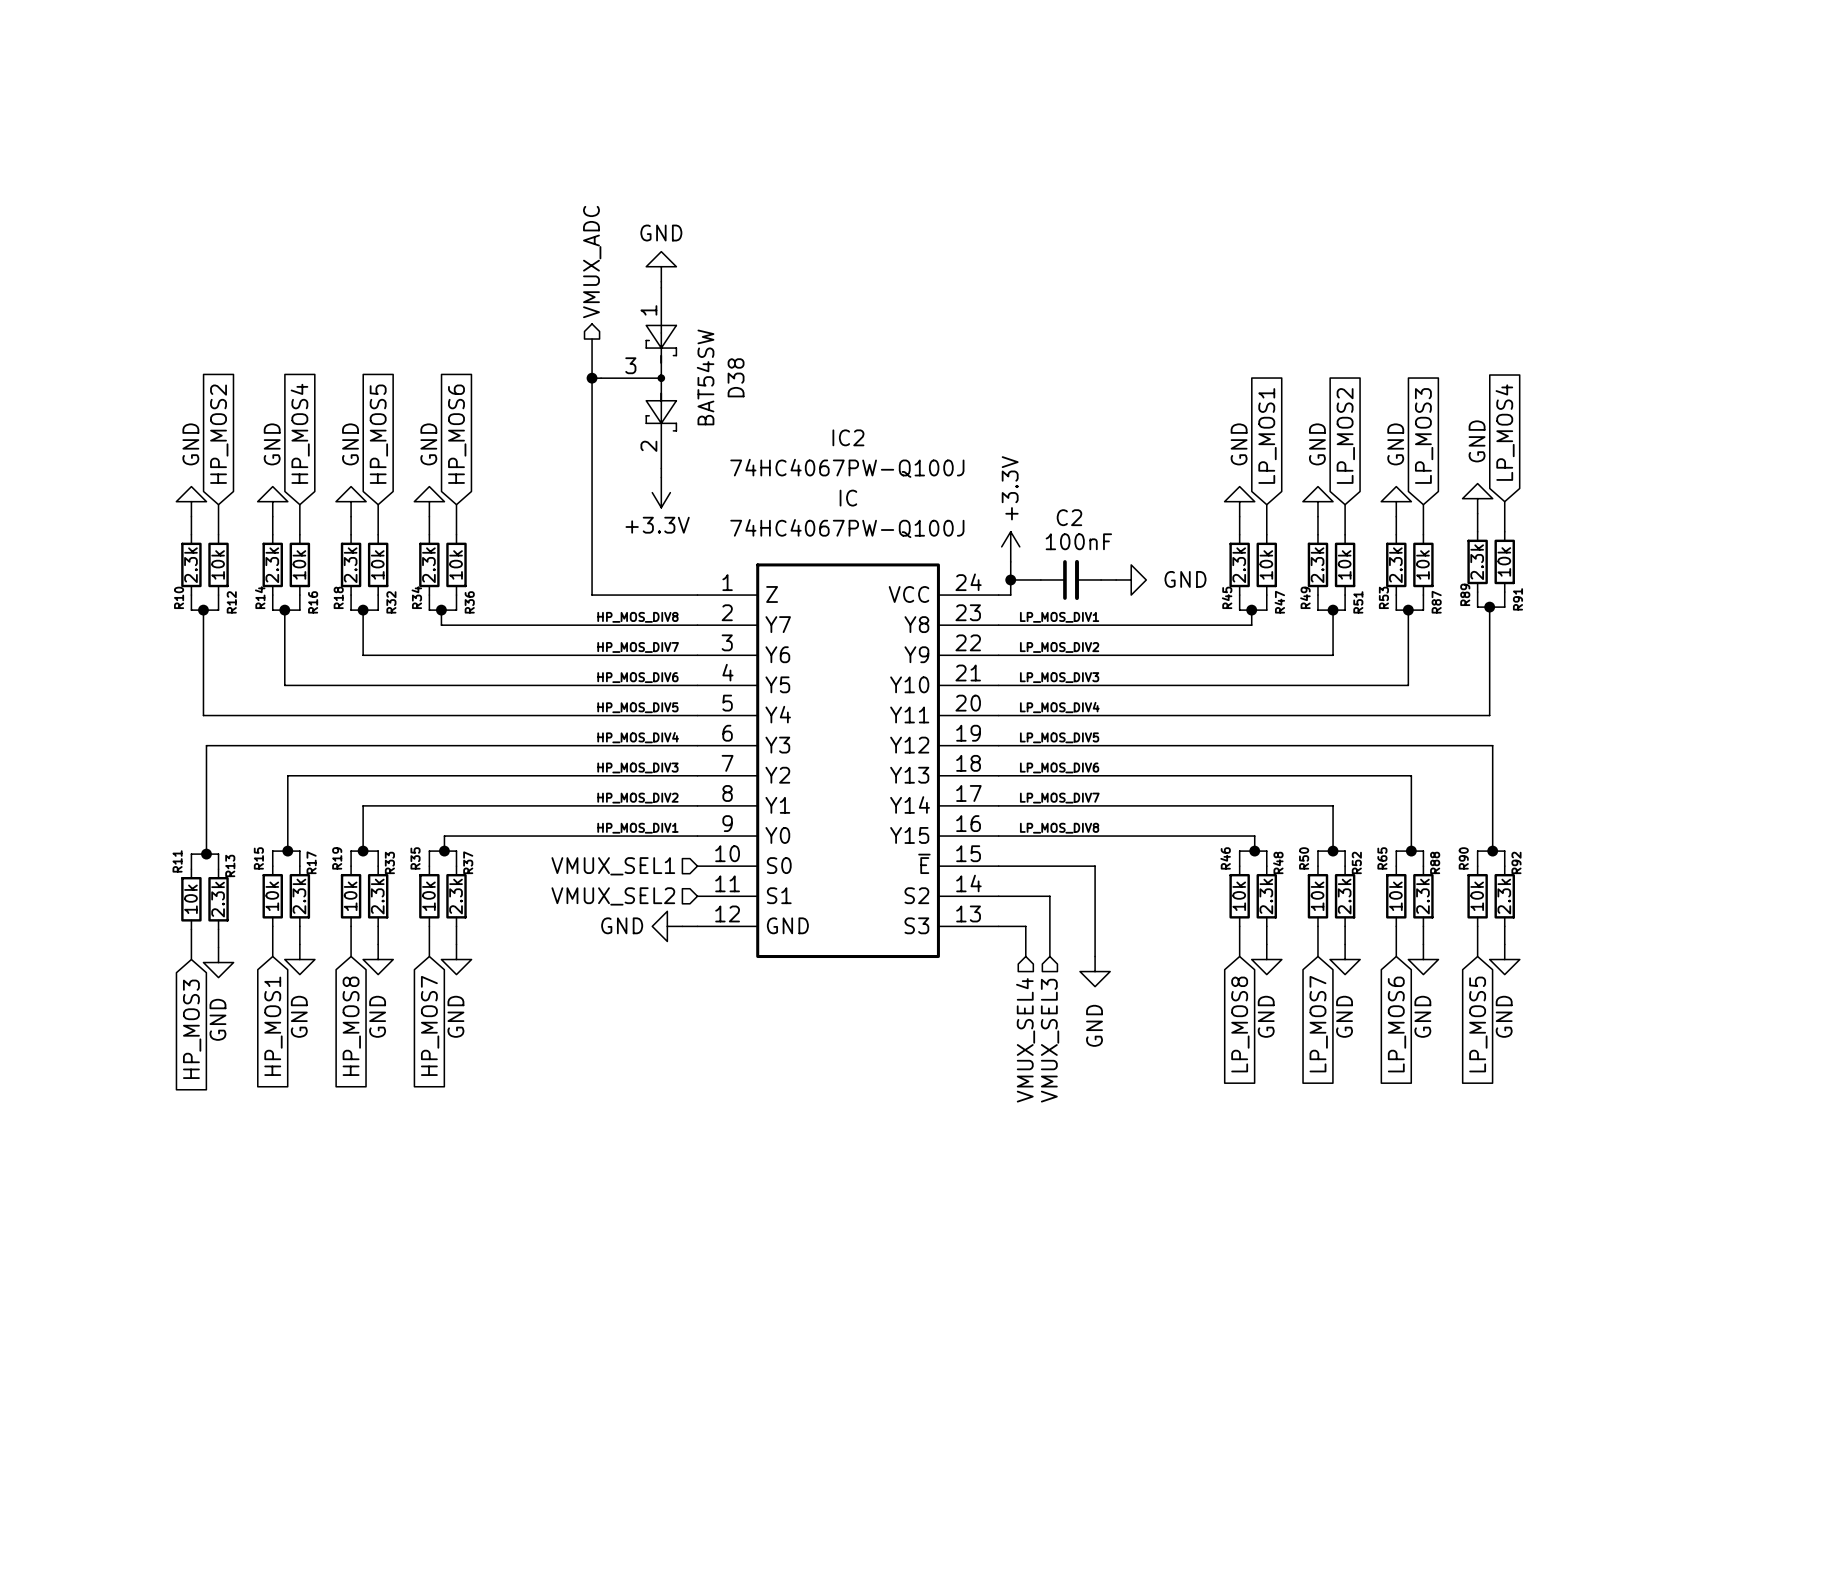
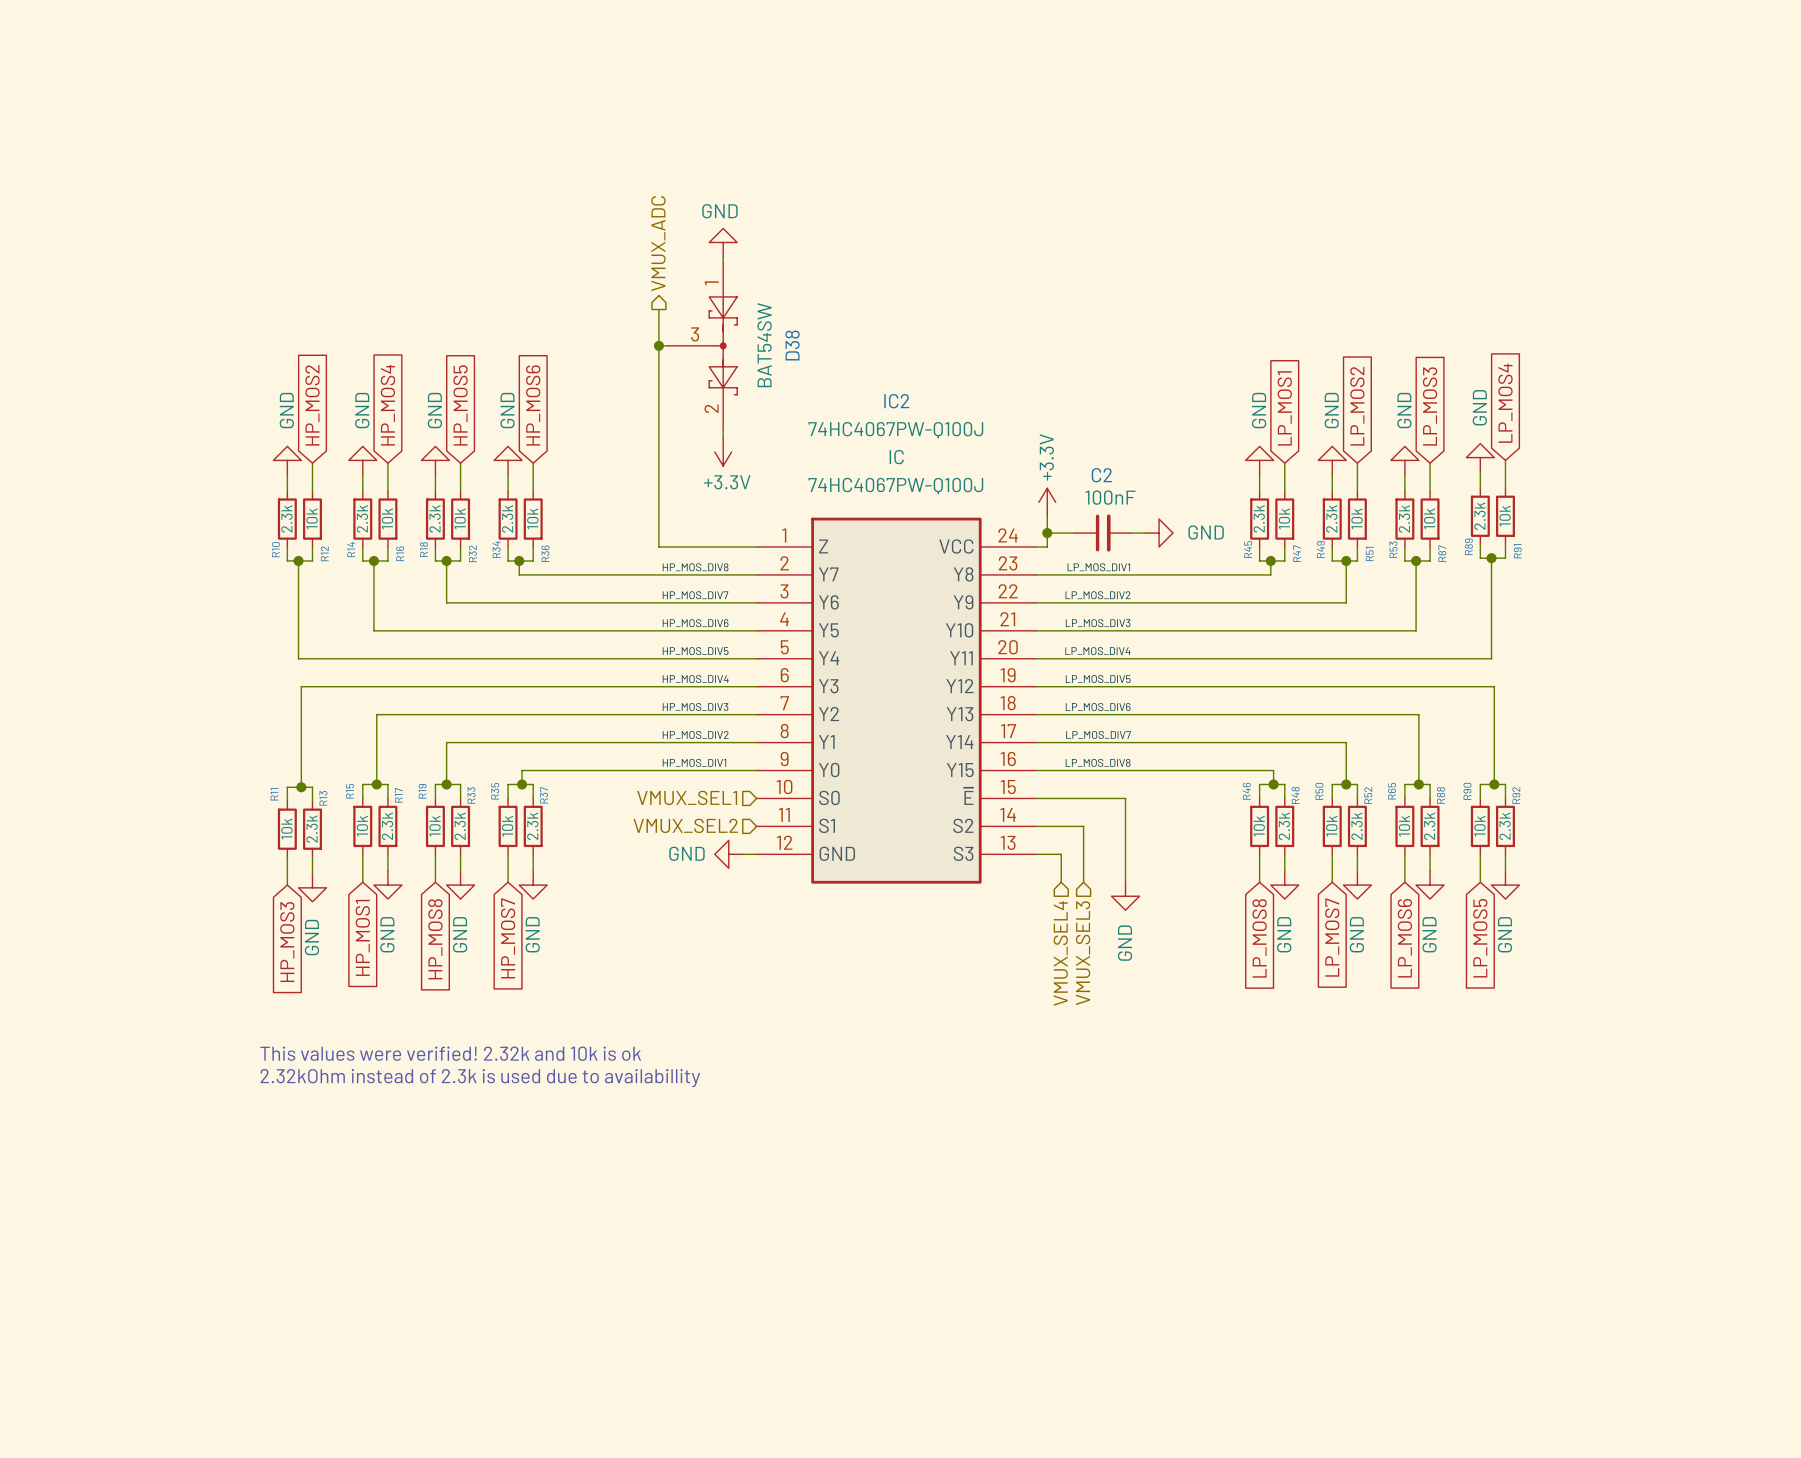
text: none -> This values were verified! 2.32k and 10k is ok (450, 1053)
text: none -> 2.32kOhm instead of 2.3k is used due to availabillity (480, 1078)

